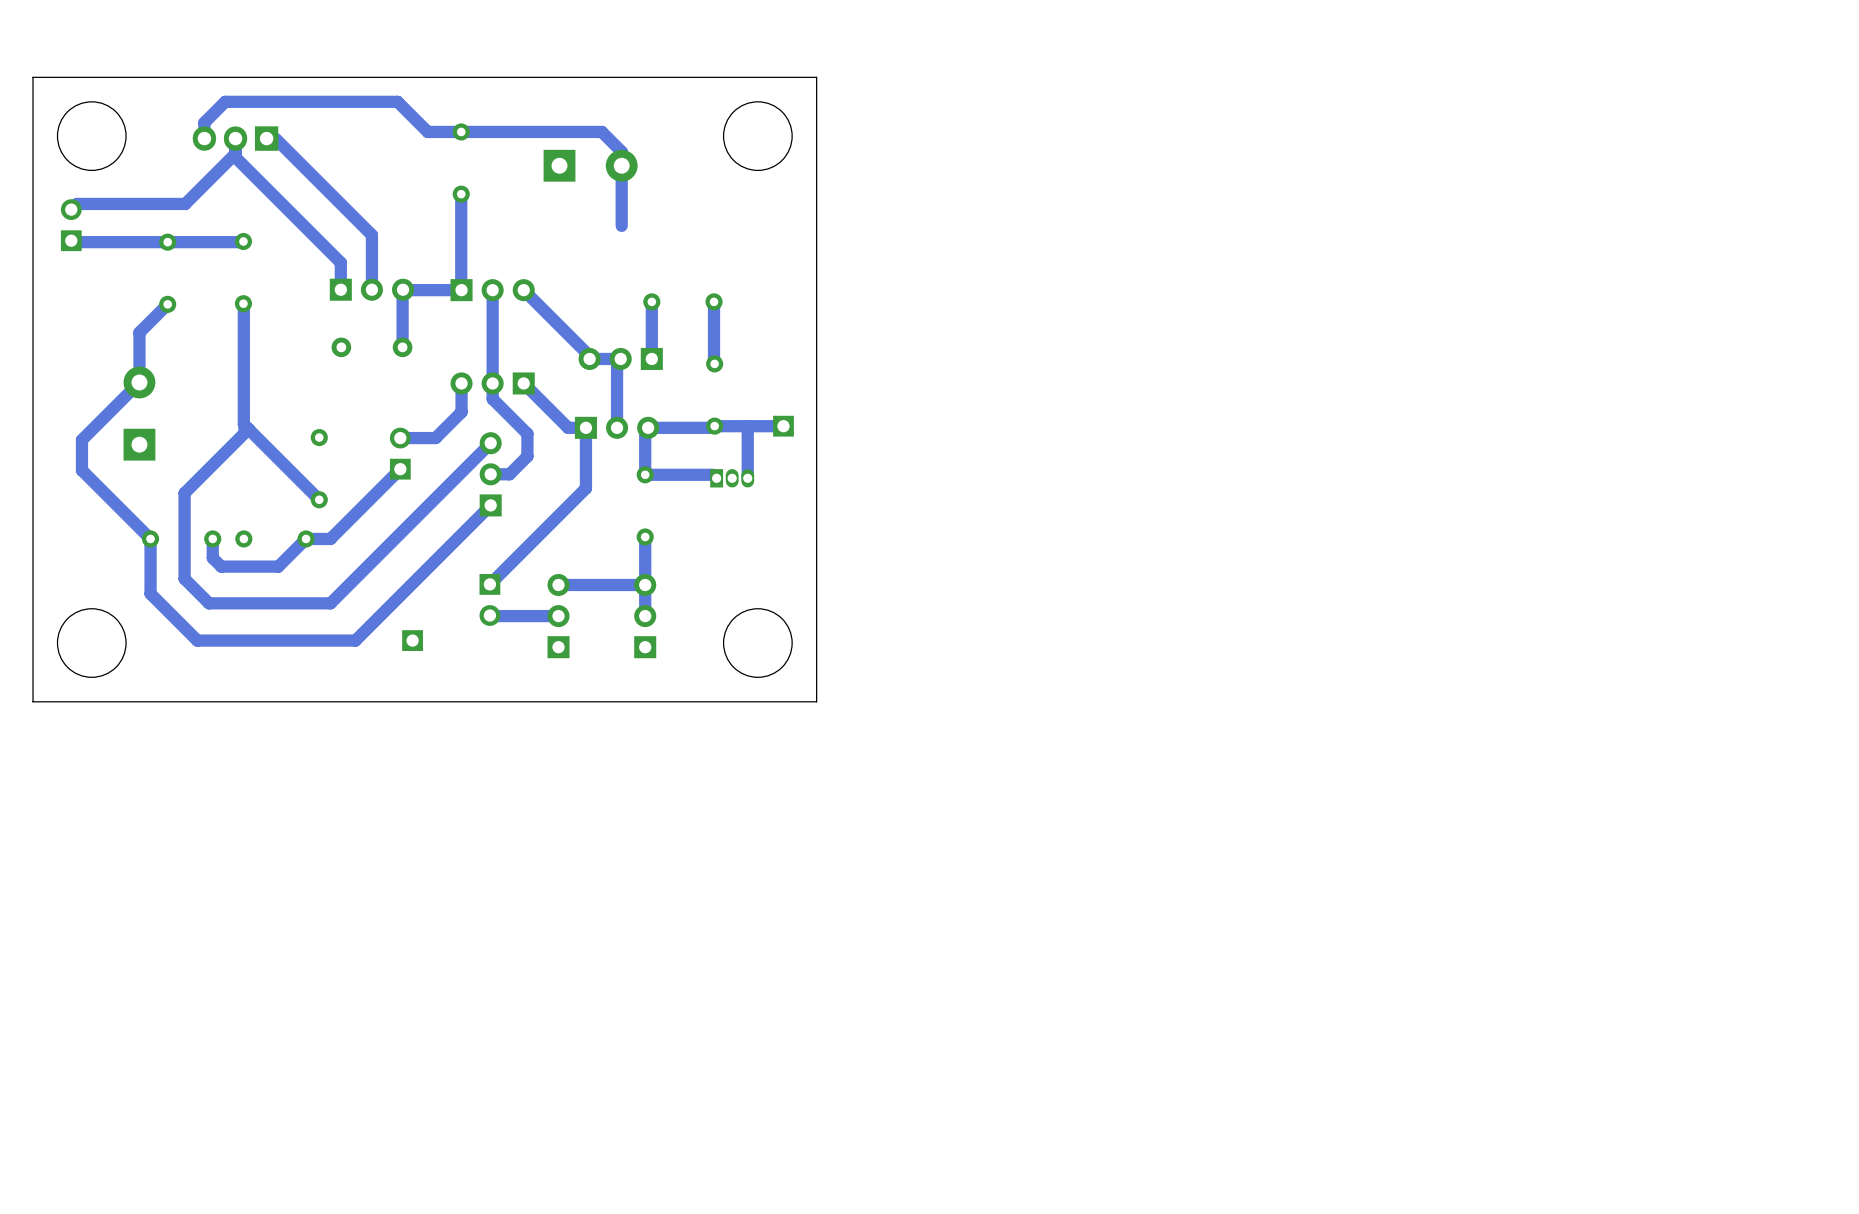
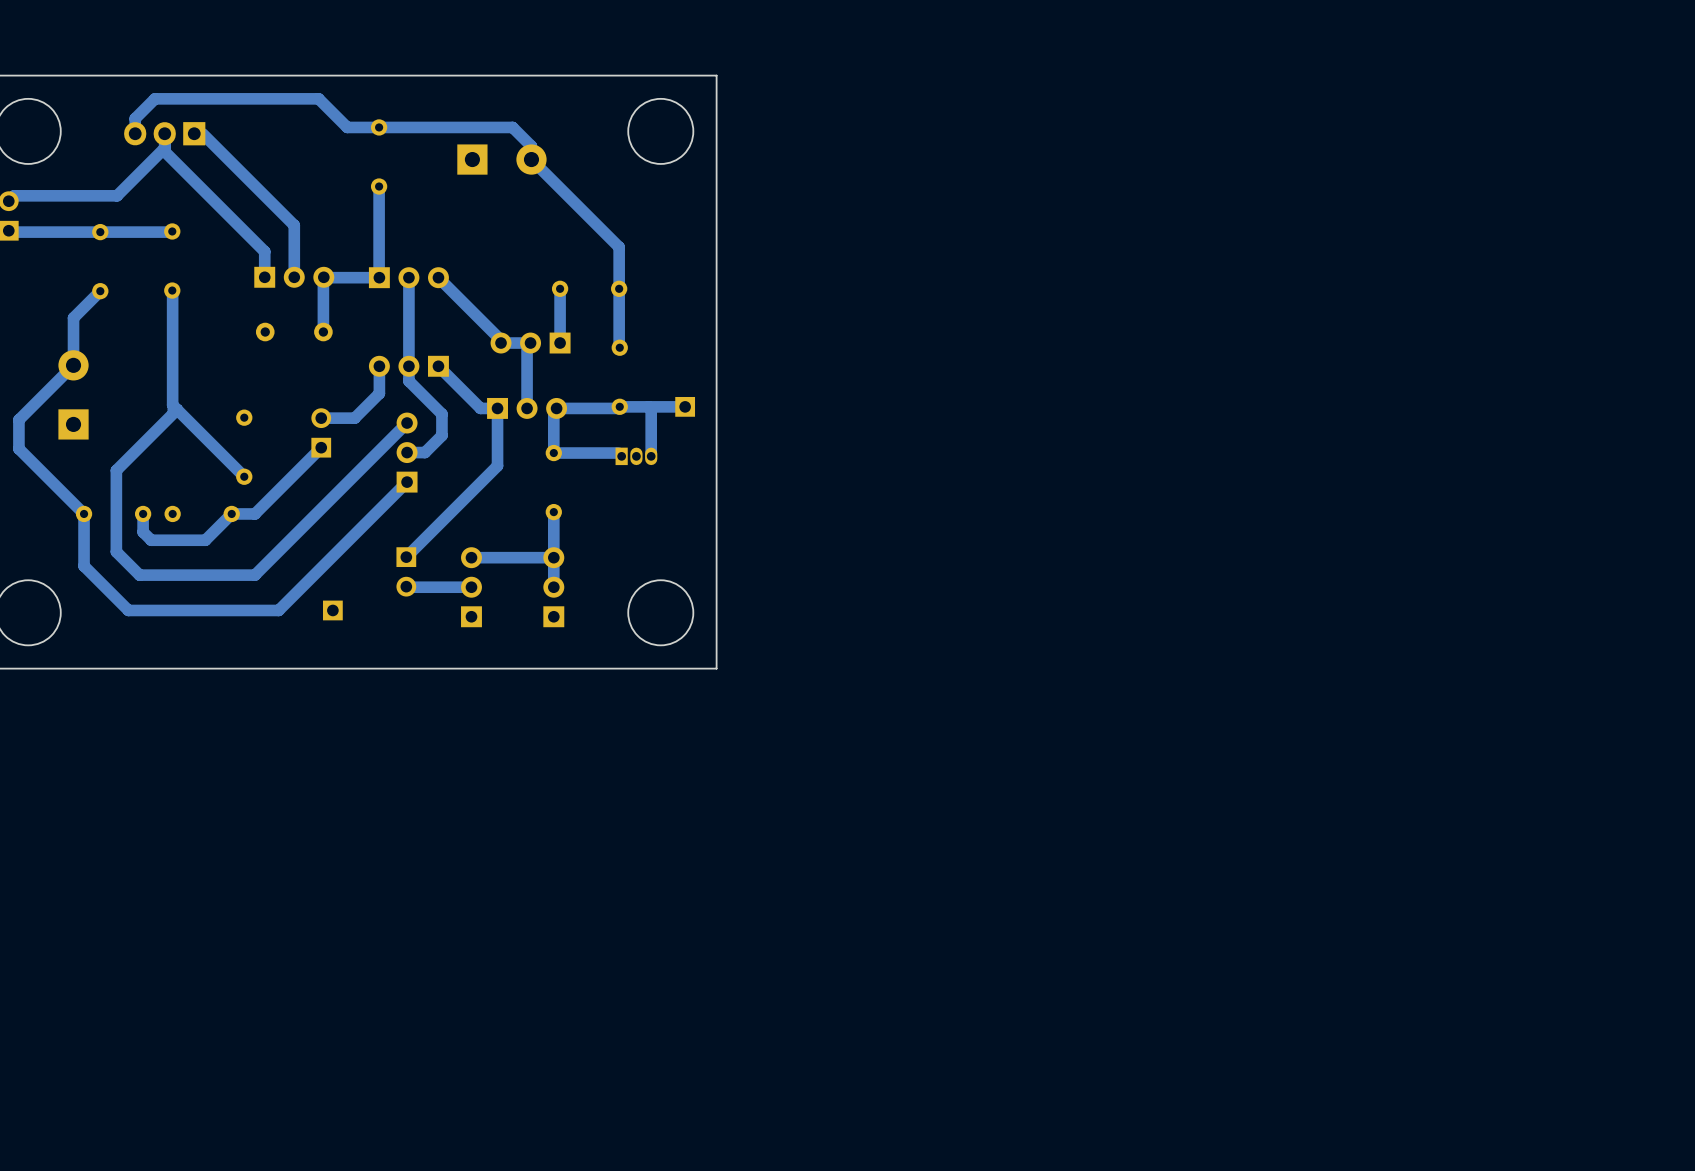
track: (621, 165) (621, 225) -> (531, 159) (619, 247) (619, 288)

